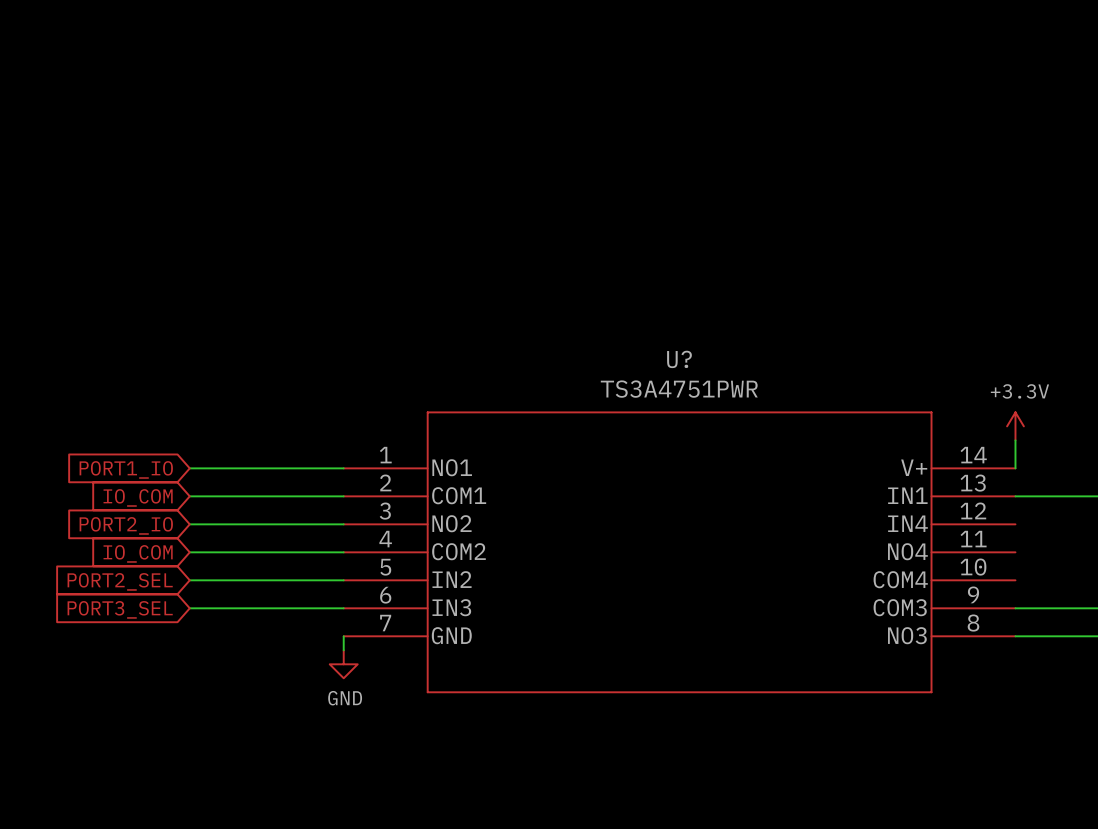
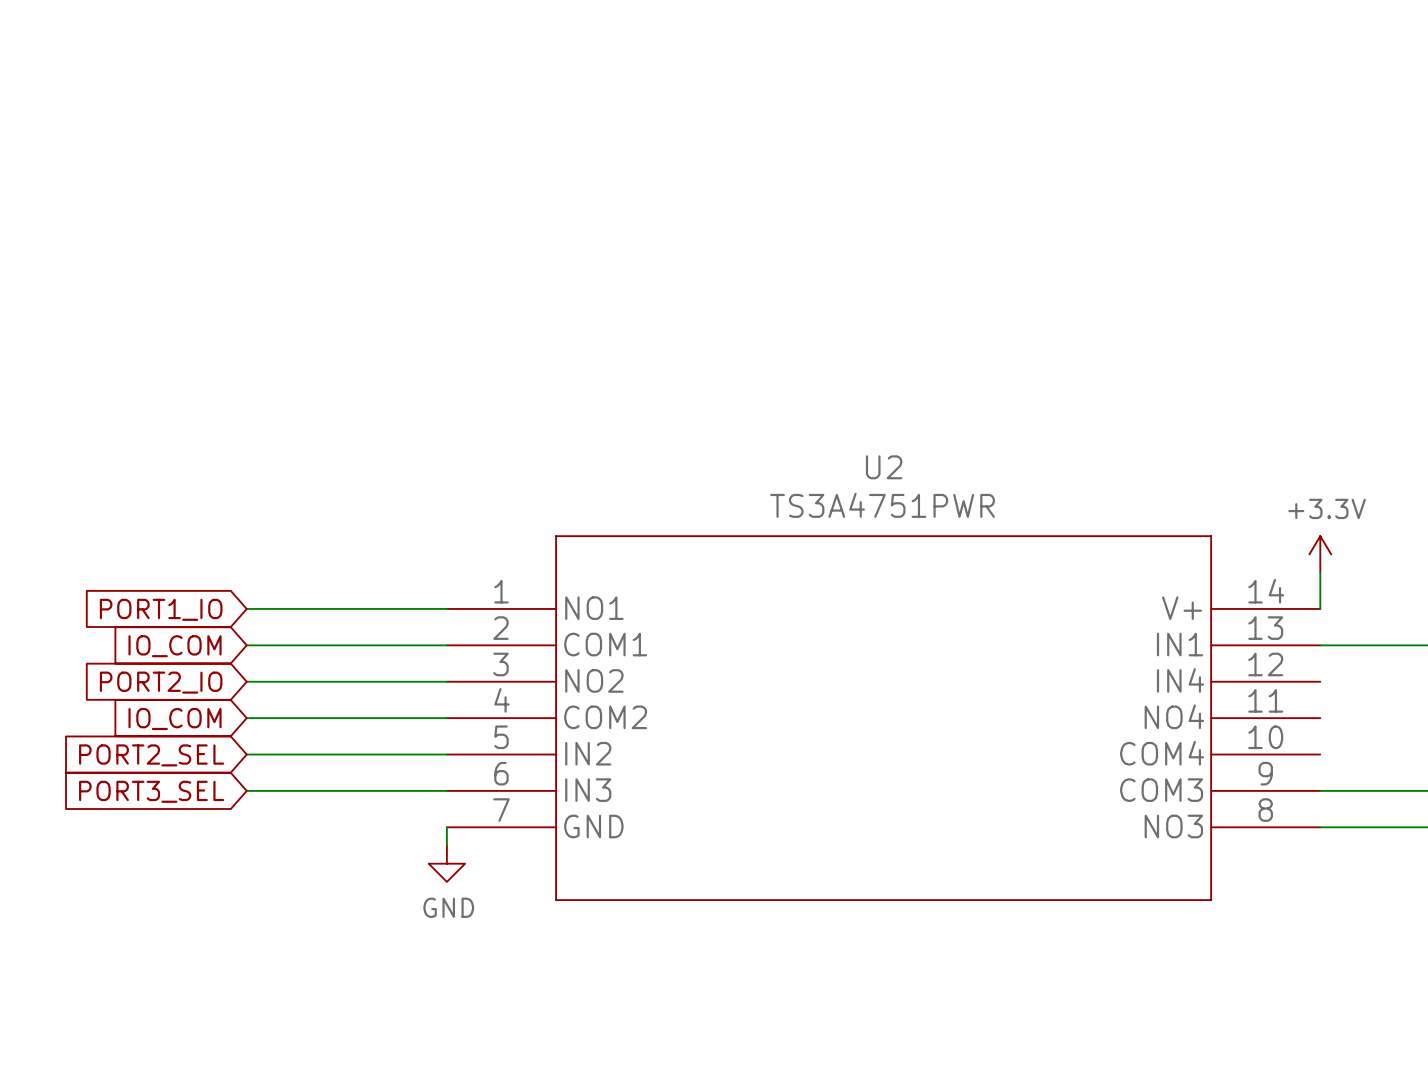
U? name: U? (679, 359) -> U2 (884, 467)

